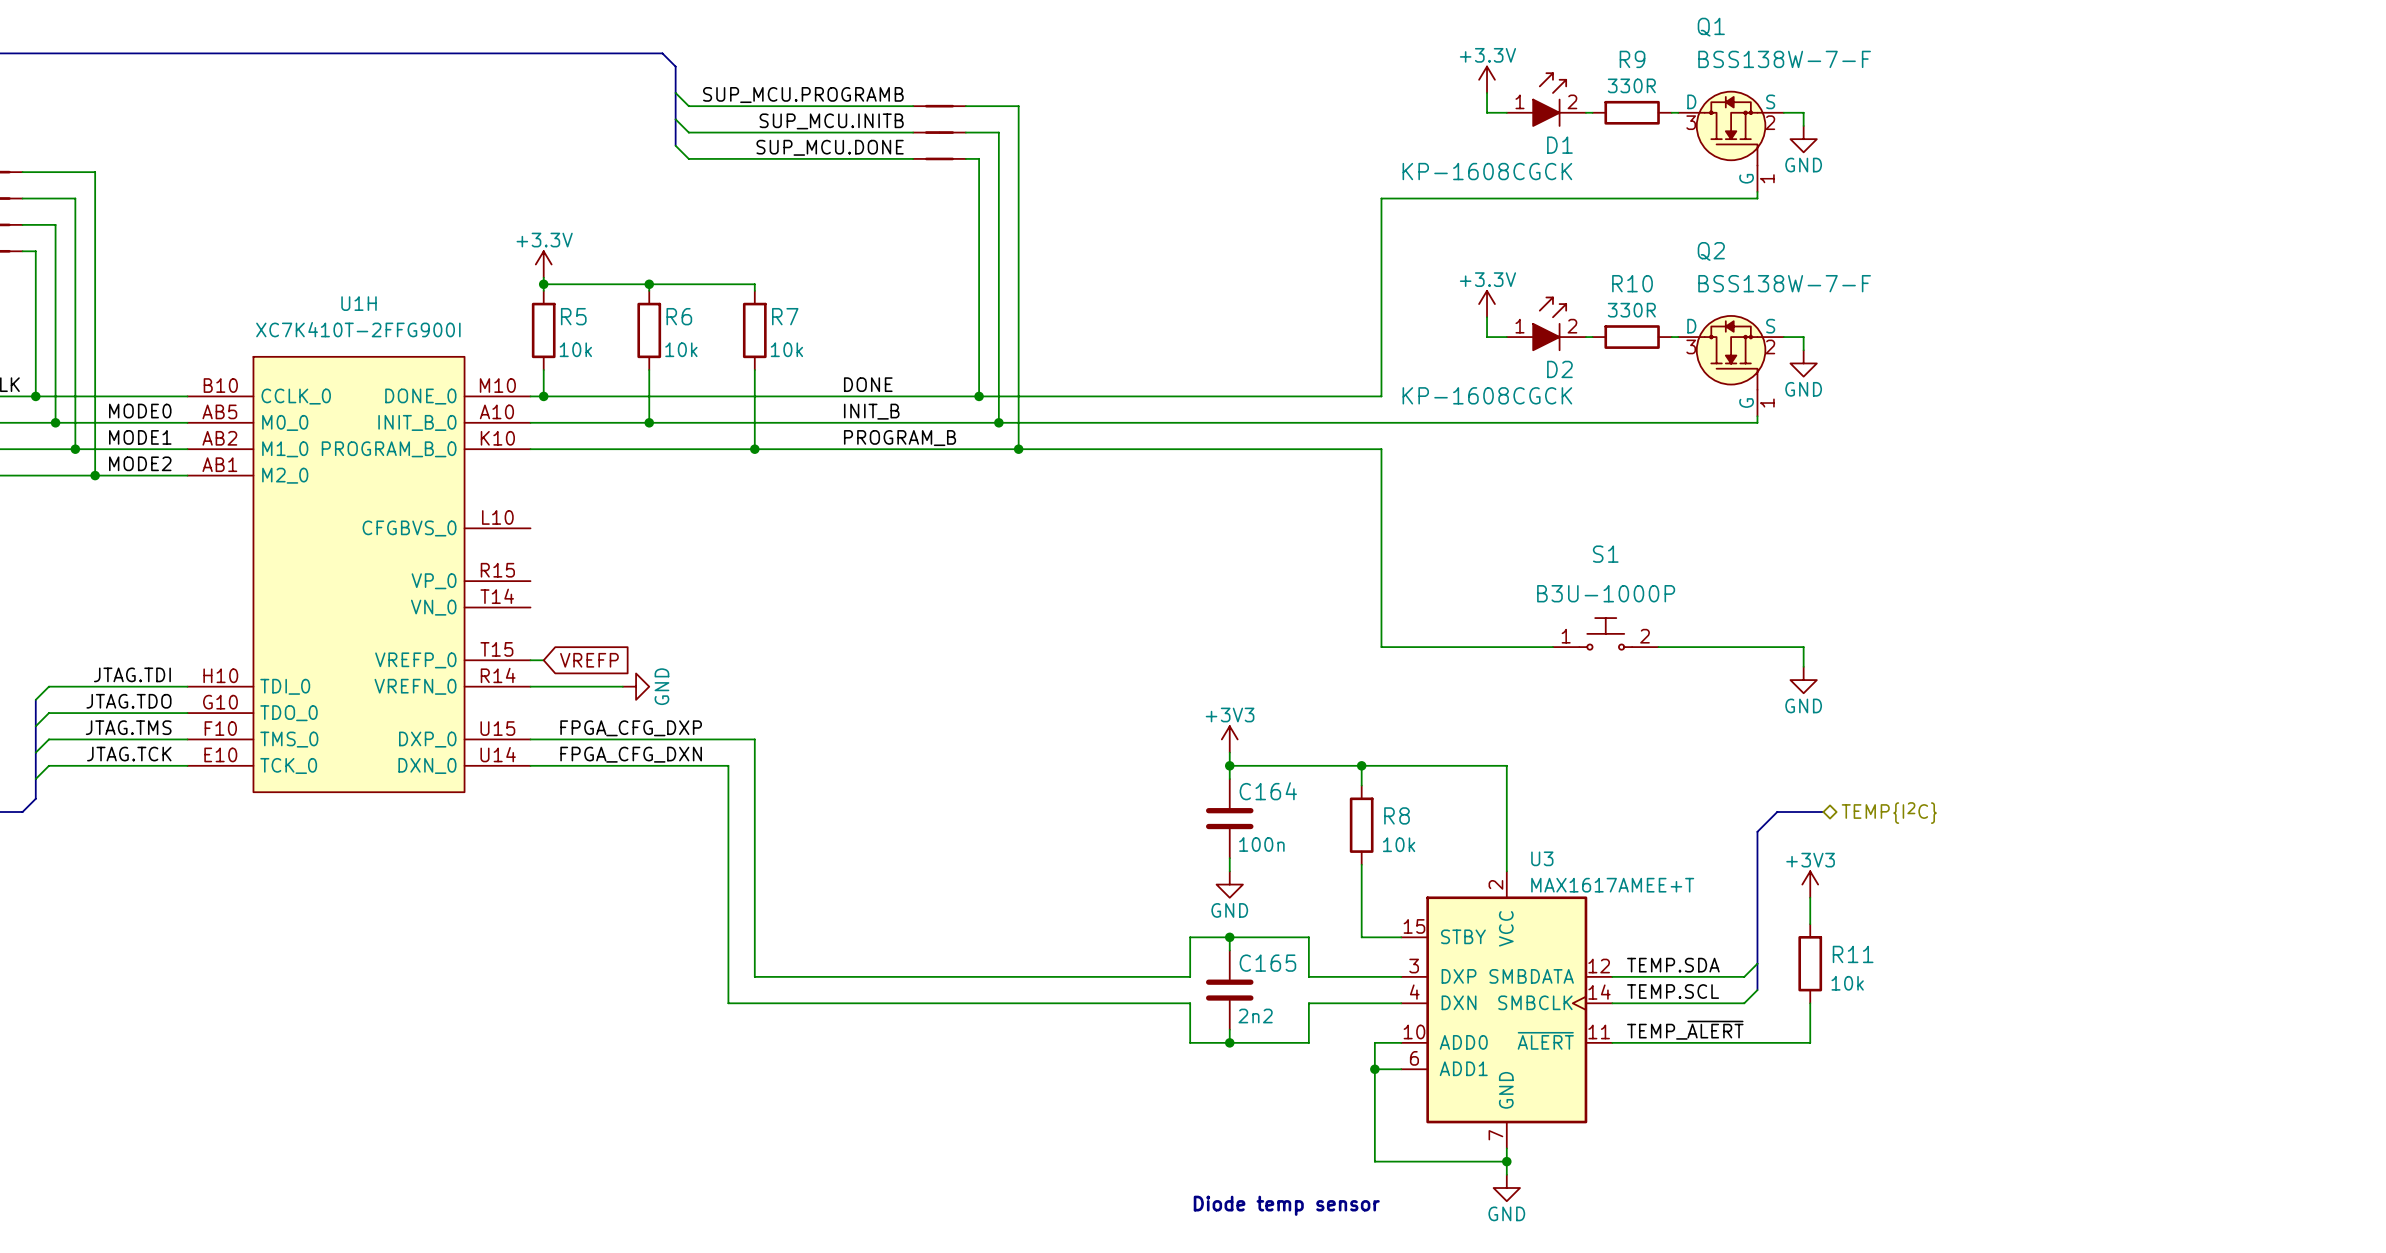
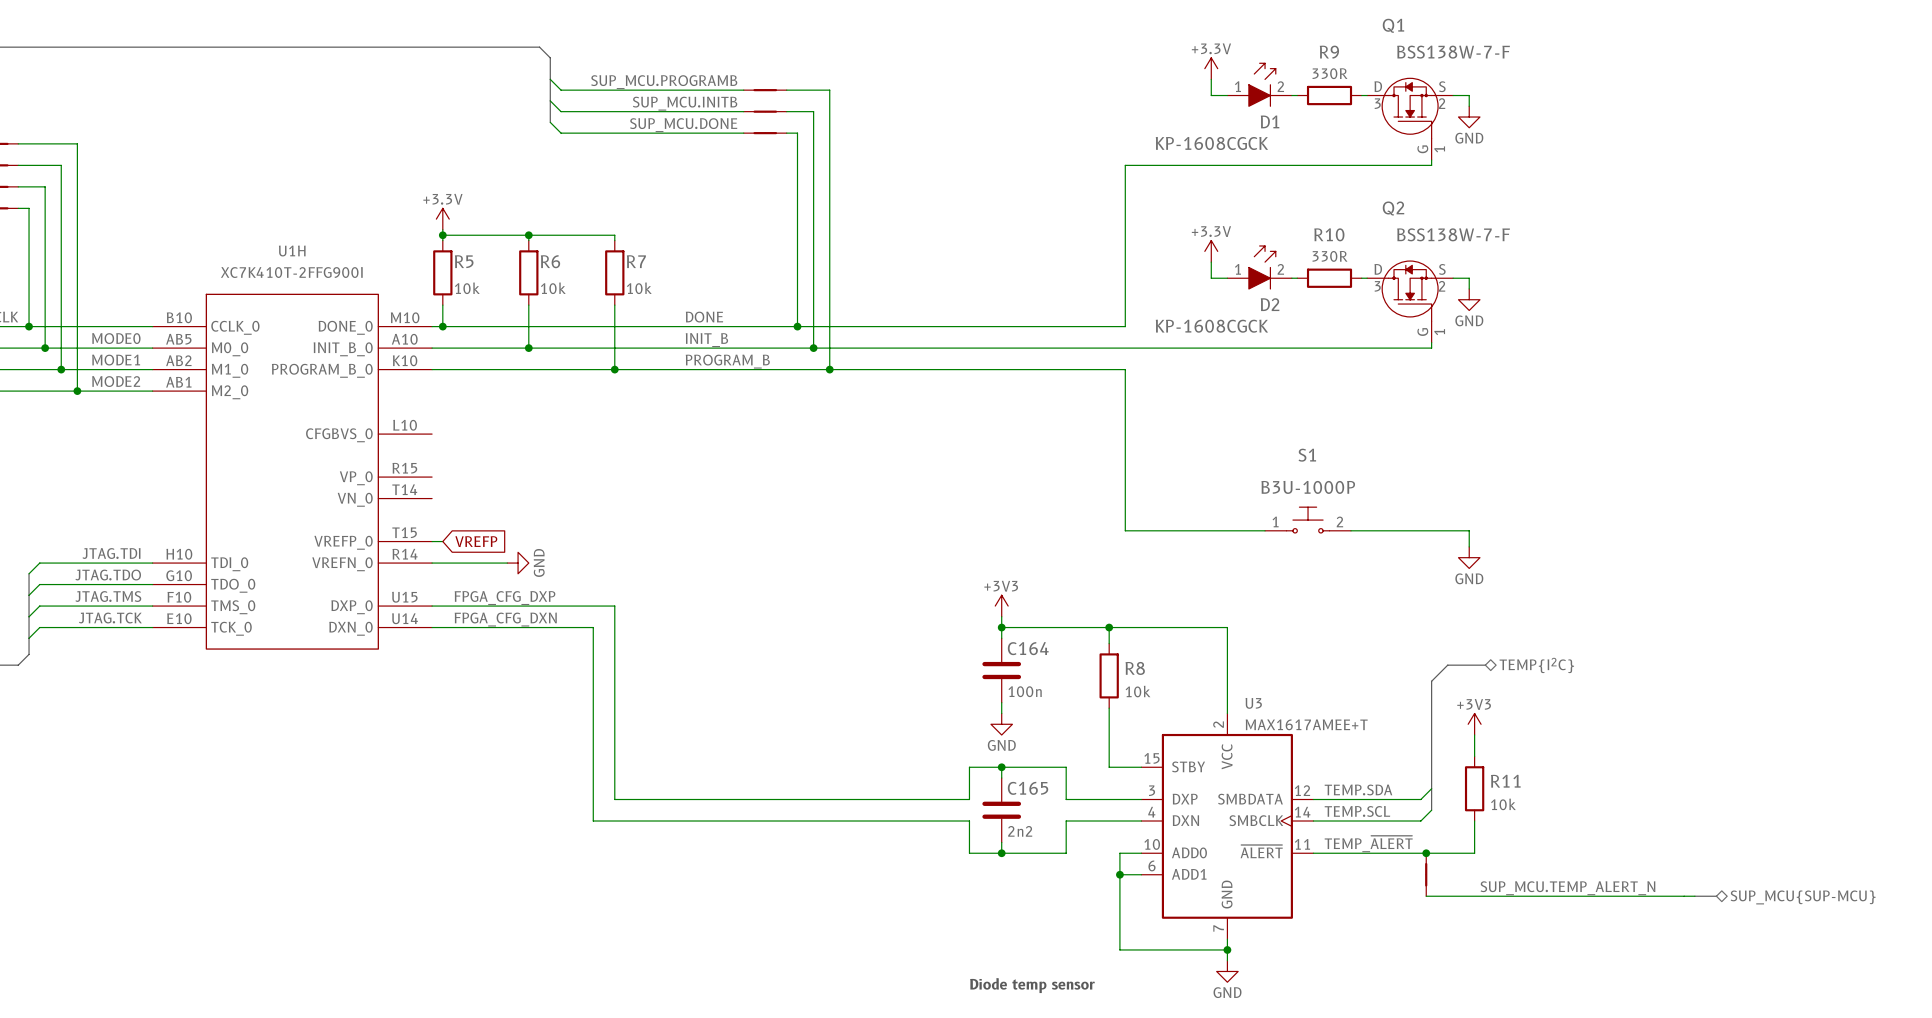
junction: none -> (1426, 853)
part: none -> (1426, 874)
label: none -> SUP_MCU.TEMP_ALERT_N (1567, 888)
wire: none -> (1426, 896) (1694, 896)
bus: none -> (1694, 896) (1716, 896)
hierarchical label: none -> SUP_MCU{SUP-MCU} (1803, 897)

